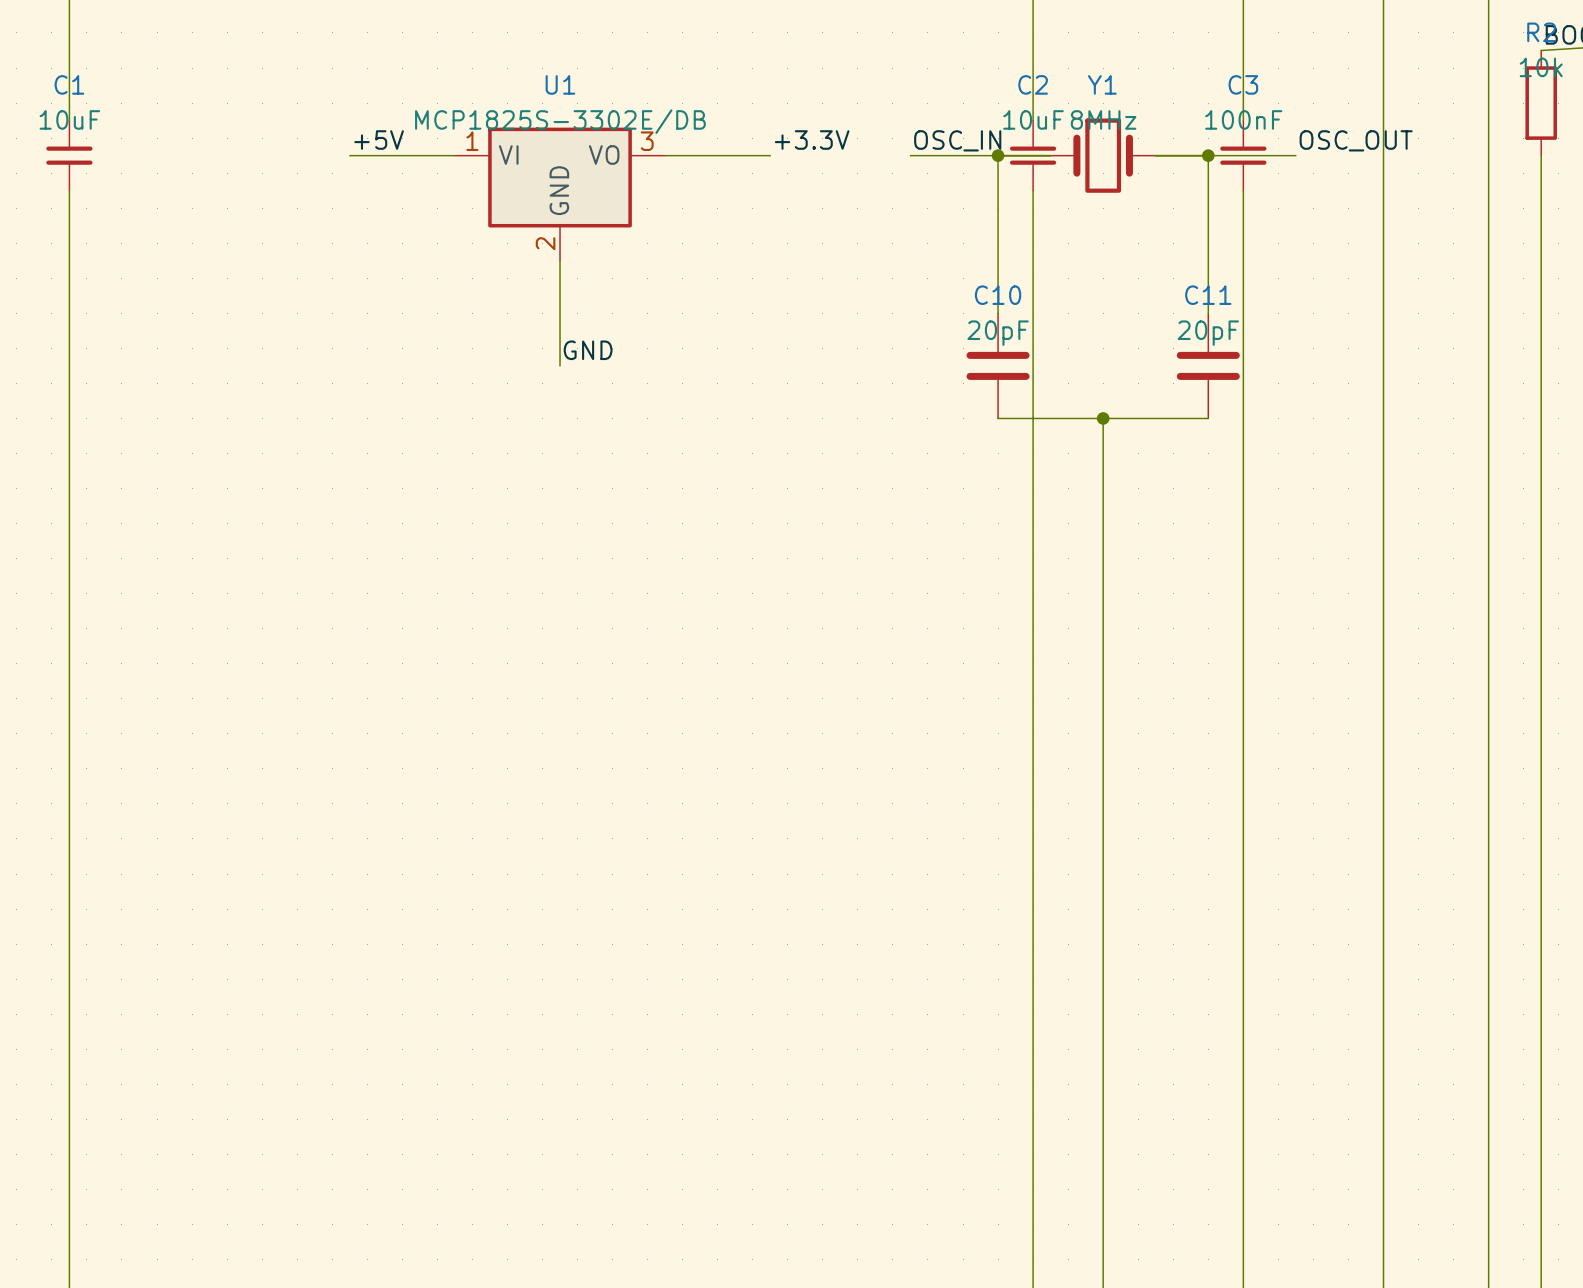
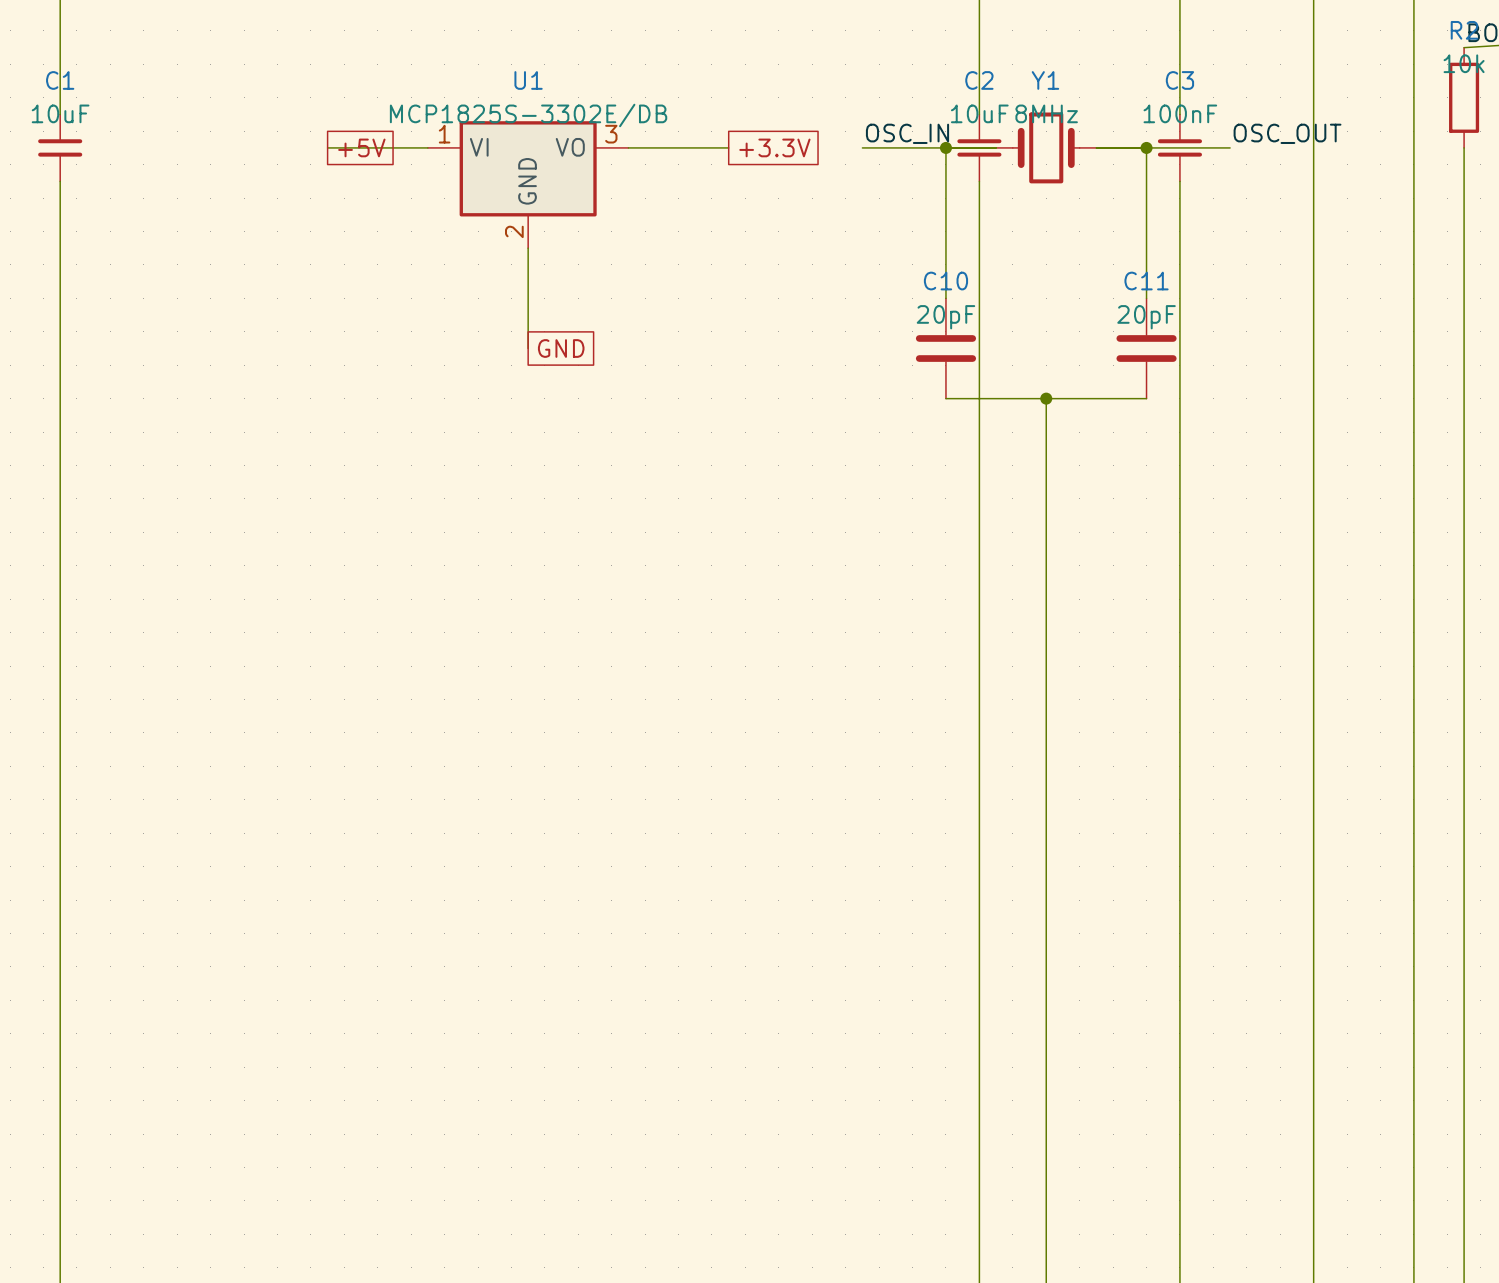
label: +5V (379, 140) -> none
label: +3.3V (812, 140) -> none
global label: none -> +5V (361, 147)
global label: none -> +3.3V (774, 147)
label: GND (588, 350) -> none
global label: none -> GND (561, 348)

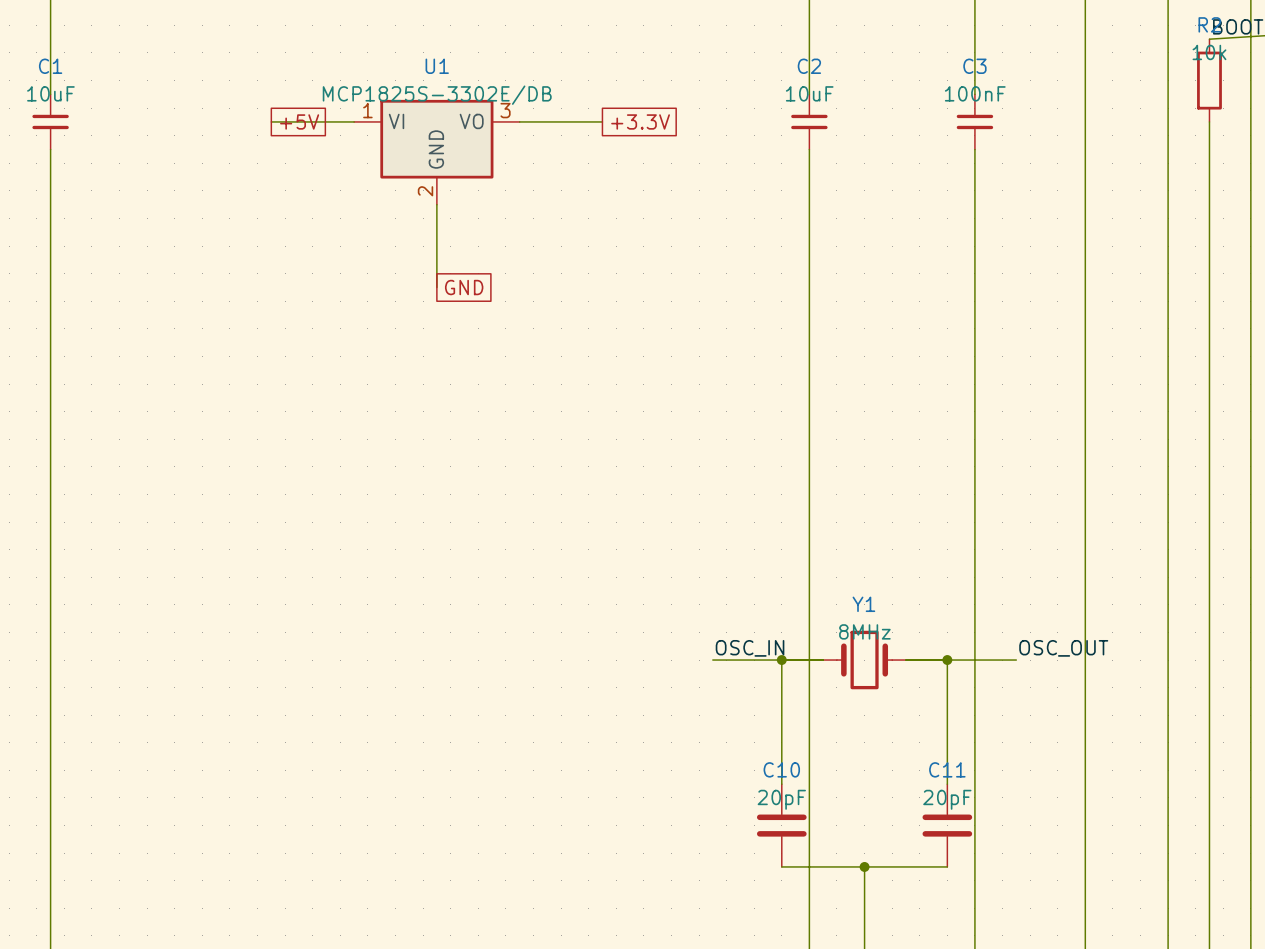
label: OSC_IN (907, 133) -> none
label: OSC_OUT (1287, 133) -> none
wire: (862, 147) (996, 147) -> none
wire: (945, 147) (945, 298) -> none
junction: (945, 147) -> none
Y1 position: (1046, 147) -> (864, 660)
wire: (1096, 147) (1230, 147) -> none
wire: (1146, 147) (1146, 298) -> none
junction: (1146, 147) -> none
C10 position: (945, 348) -> (781, 825)
C11 position: (1146, 348) -> (947, 825)
wire: (945, 398) (1146, 398) -> none
wire: (1046, 398) (1046, 1050) -> none
junction: (1046, 398) -> none
label: none -> OSC_IN (750, 648)
label: none -> OSC_OUT (1063, 648)
wire: none -> (712, 660) (823, 660)
wire: none -> (781, 660) (781, 784)
junction: none -> (781, 660)
wire: none -> (905, 660) (1016, 660)
wire: none -> (947, 660) (947, 784)
junction: none -> (947, 660)
wire: none -> (781, 866) (947, 866)
junction: none -> (864, 866)

